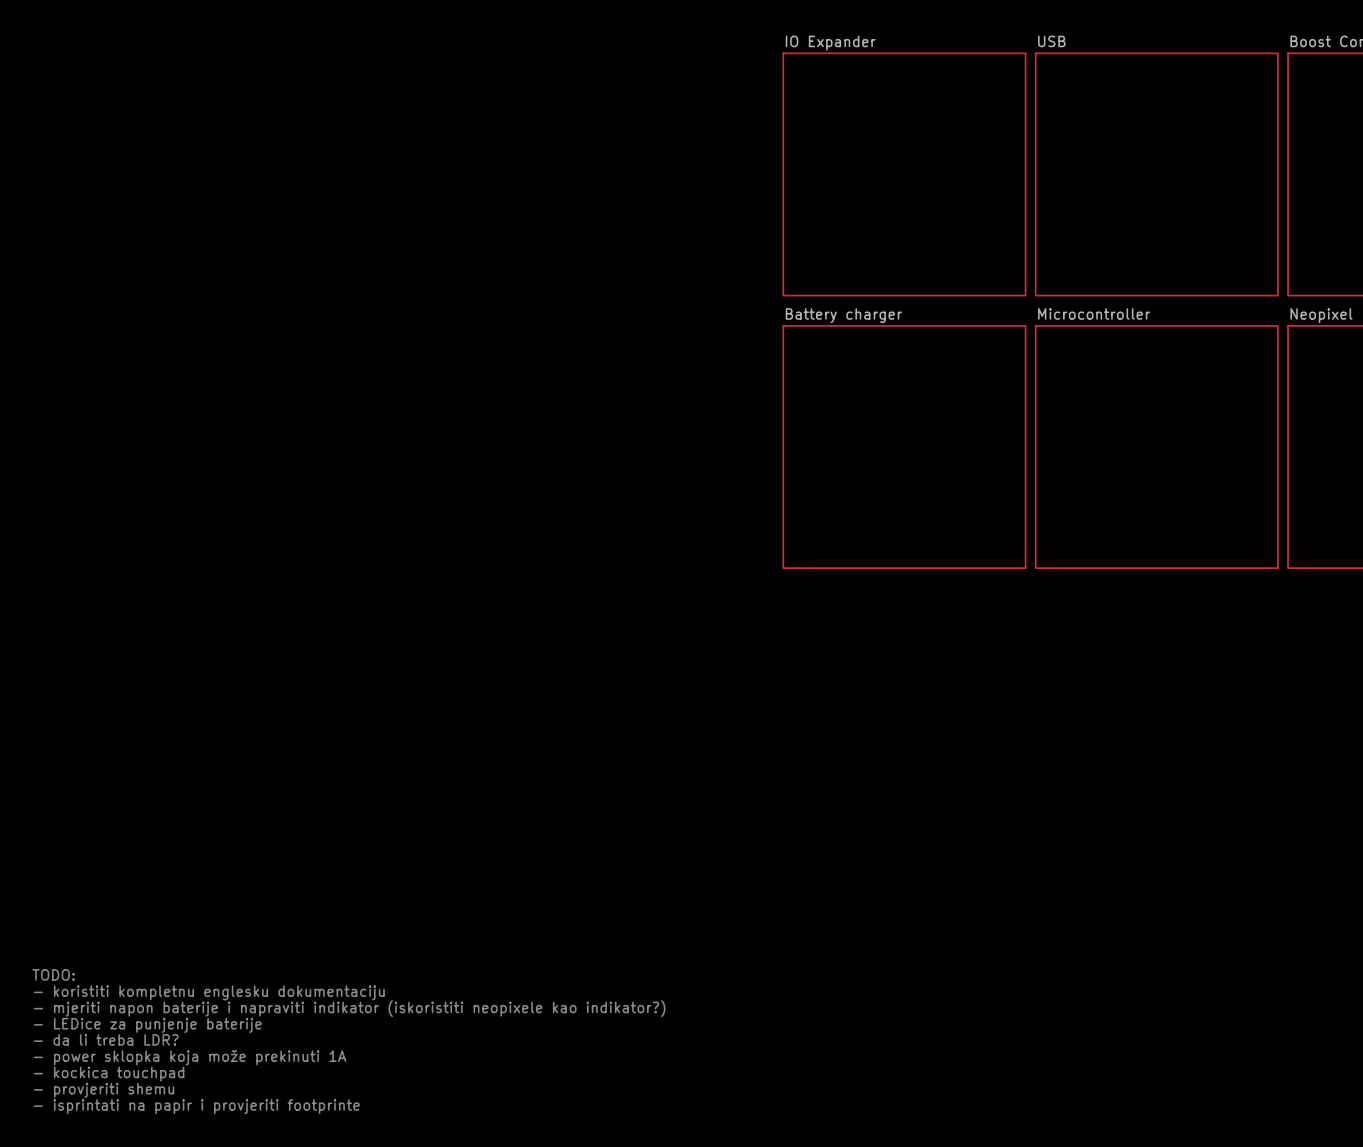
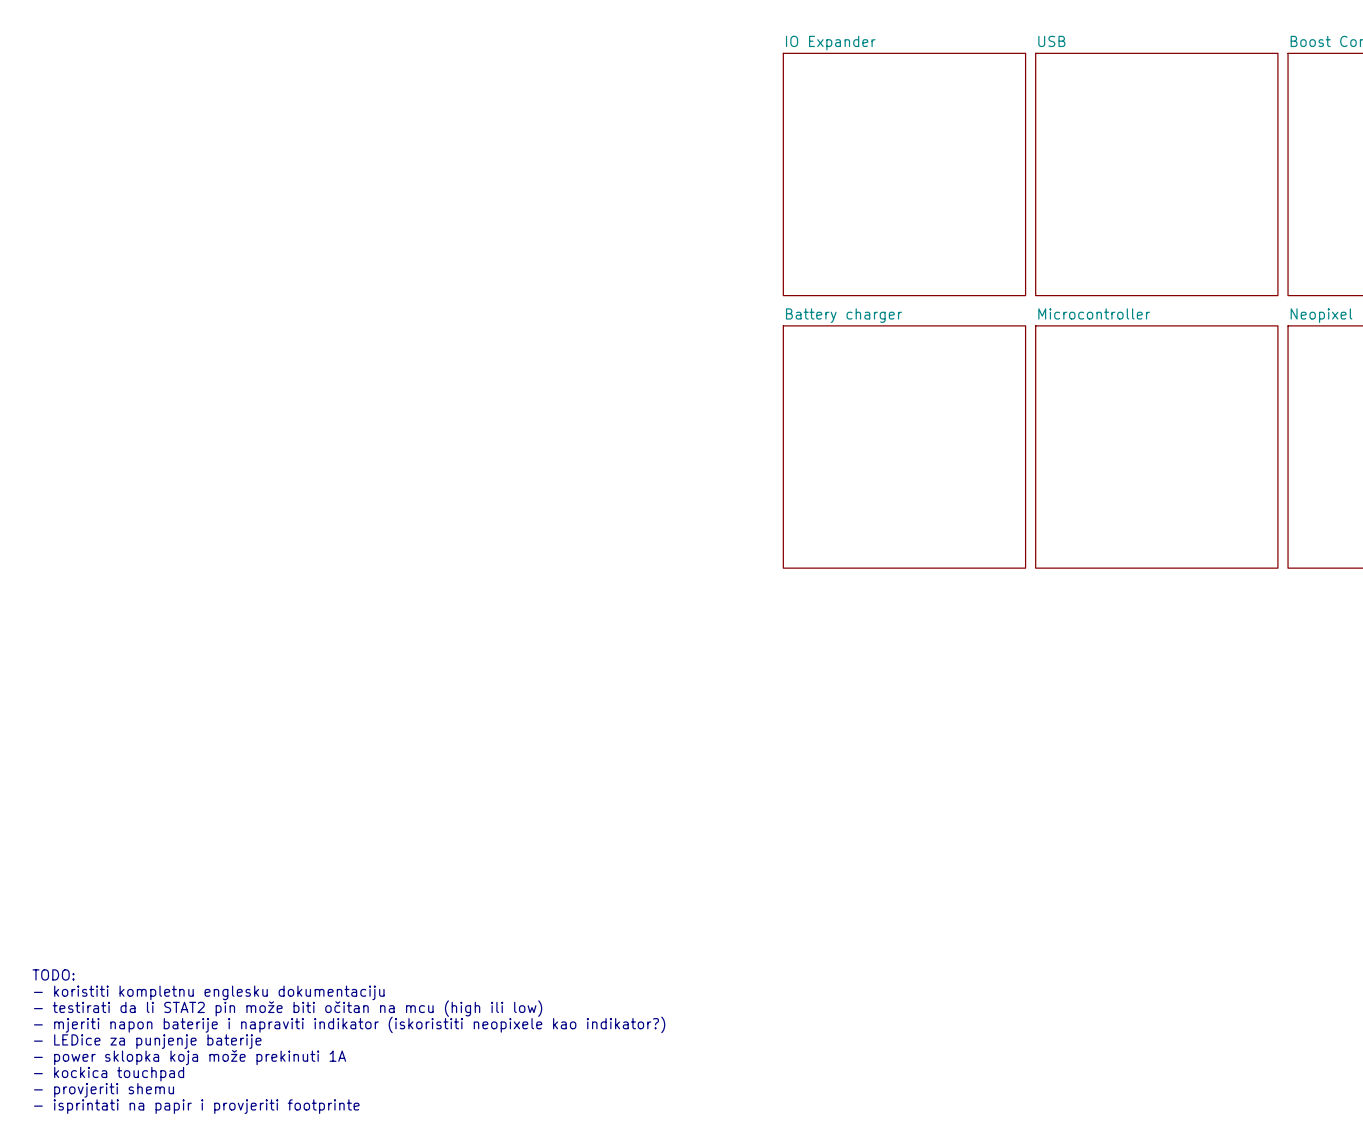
text: - mjeriti napon baterije i napraviti indikator (iskoristiti neopixele kao indikator?) (349, 1008) -> - testirati da li STAT2 pin može biti očitan na mcu (high ili low) (288, 1008)
text: - LEDice za punjenje baterije (147, 1025) -> - mjeriti napon baterije i napraviti indikator (iskoristiti neopixele kao indikator?) (349, 1024)
text: - da li treba LDR? (106, 1039) -> - LEDice za punjenje baterije (147, 1041)

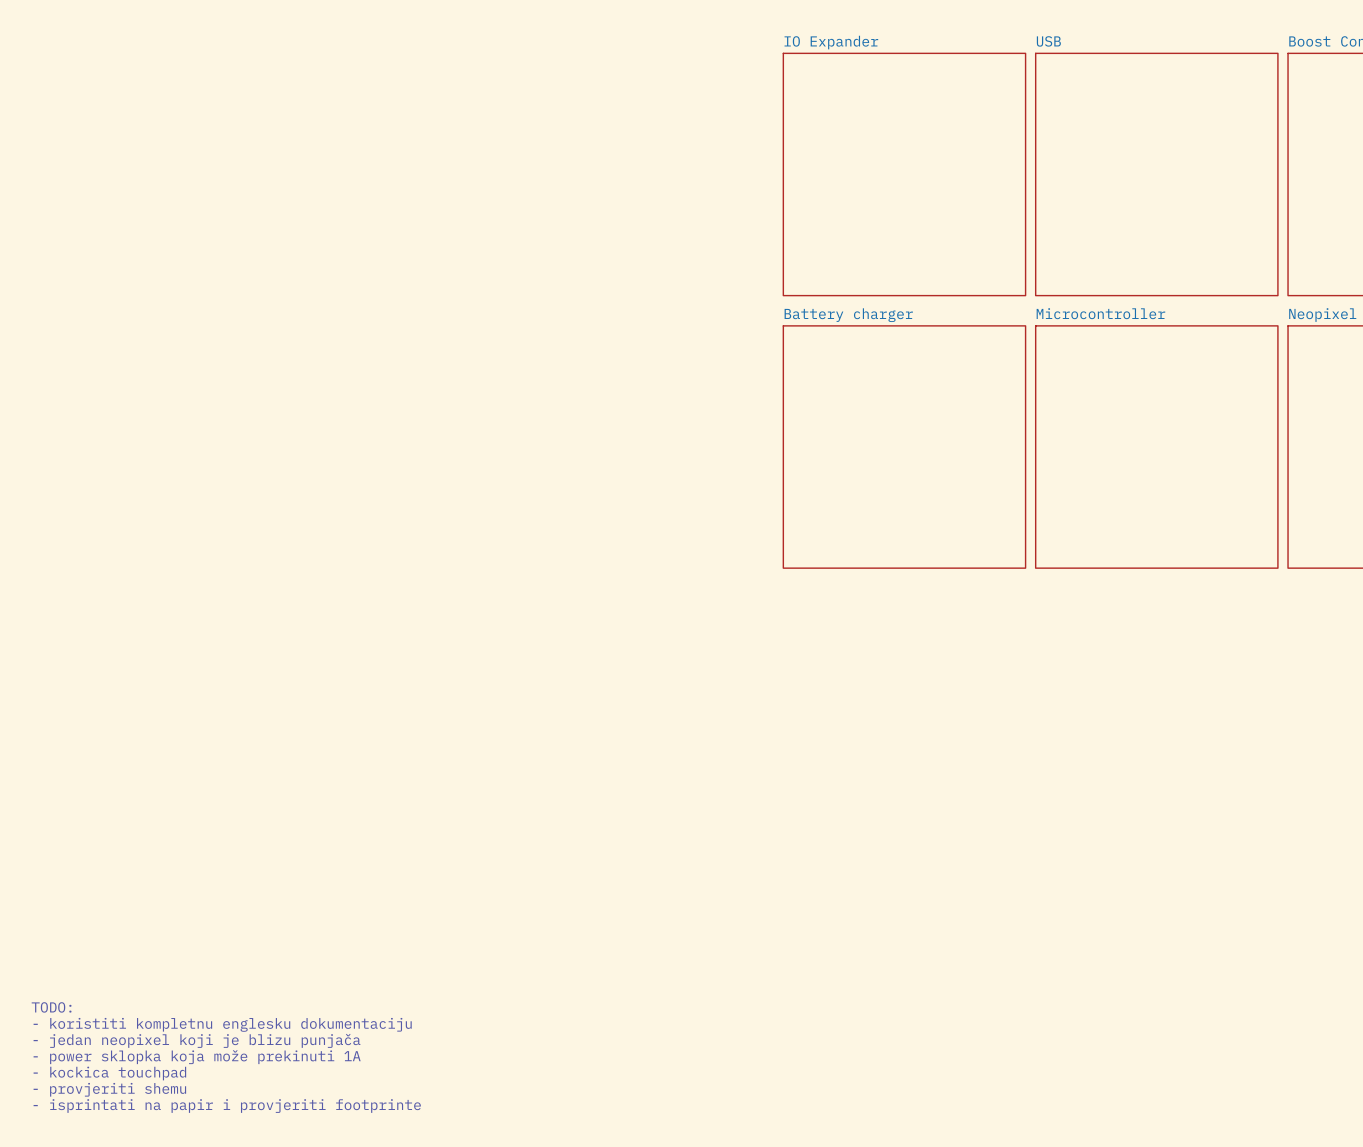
text: TODO: (53, 974) -> none
text: - koristiti kompletnu englesku dokumentaciju (209, 992) -> none
text: - testirati da li STAT2 pin može biti očitan na mcu (high ili low) (288, 1008) -> TODO: (51, 1007)
text: - mjeriti napon baterije i napraviti indikator (iskoristiti neopixele kao indikator?) (349, 1024) -> - koristiti kompletnu englesku dokumentaciju (222, 1024)
text: - LEDice za punjenje baterije (147, 1041) -> - jedan neopixel koji je blizu punjača (196, 1040)

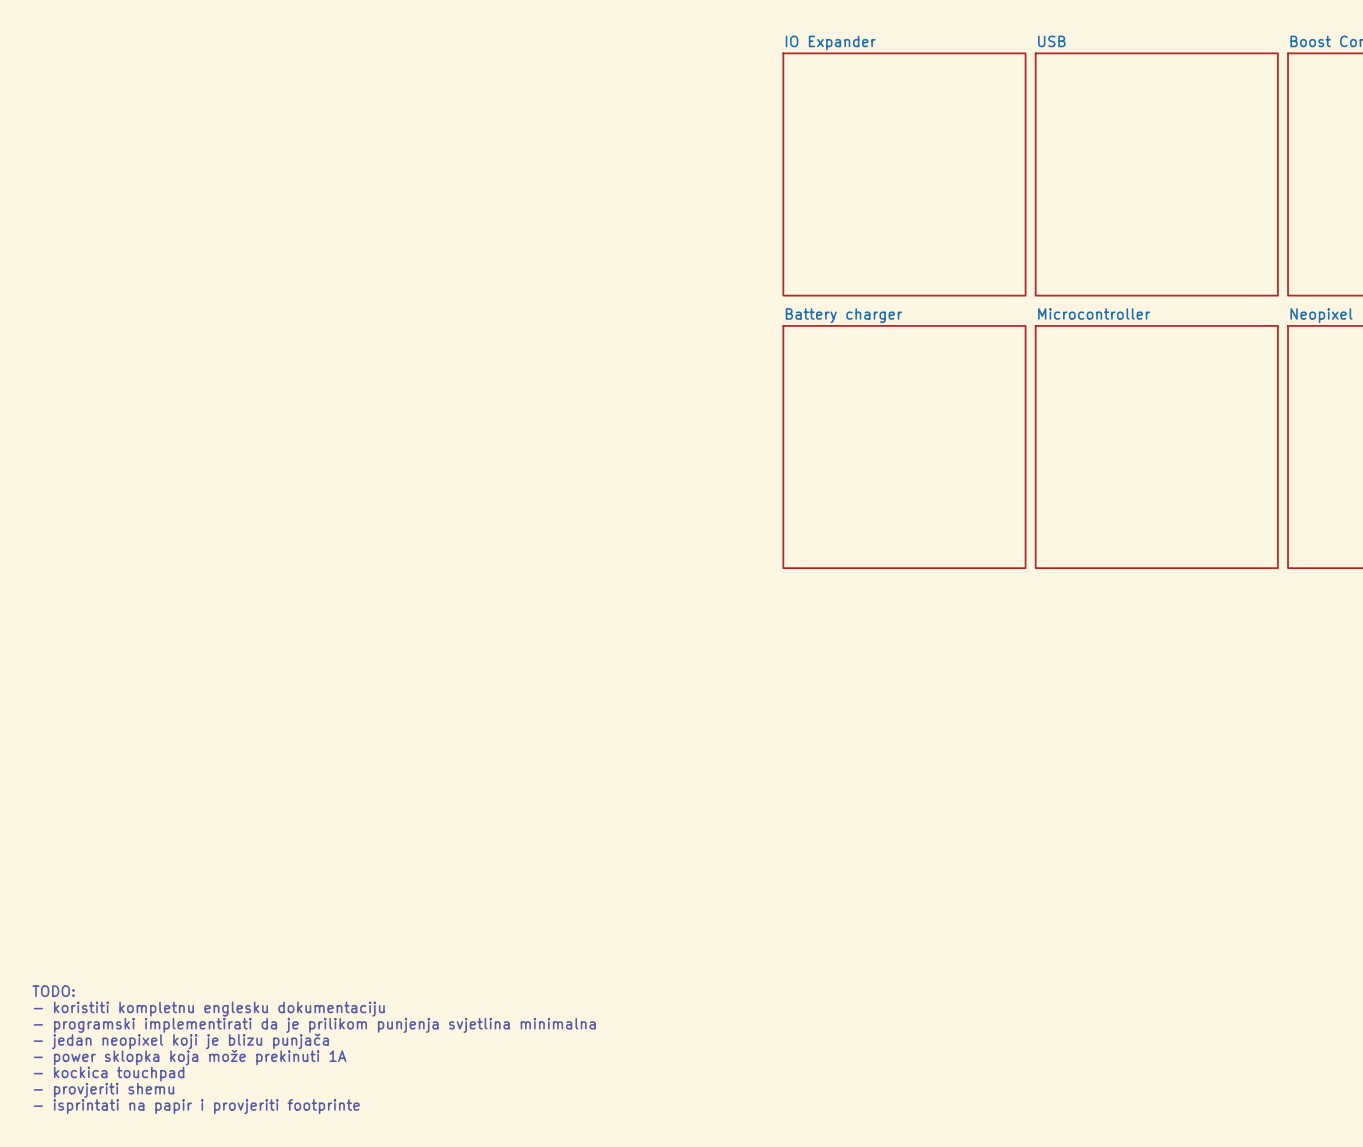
text: none -> TODO: (53, 991)
text: TODO: (51, 1007) -> - koristiti kompletnu englesku dokumentaciju (209, 1009)
text: - koristiti kompletnu englesku dokumentaciju (222, 1024) -> - programski implementirati da je prilikom punjenja svjetlina minimalna (314, 1025)

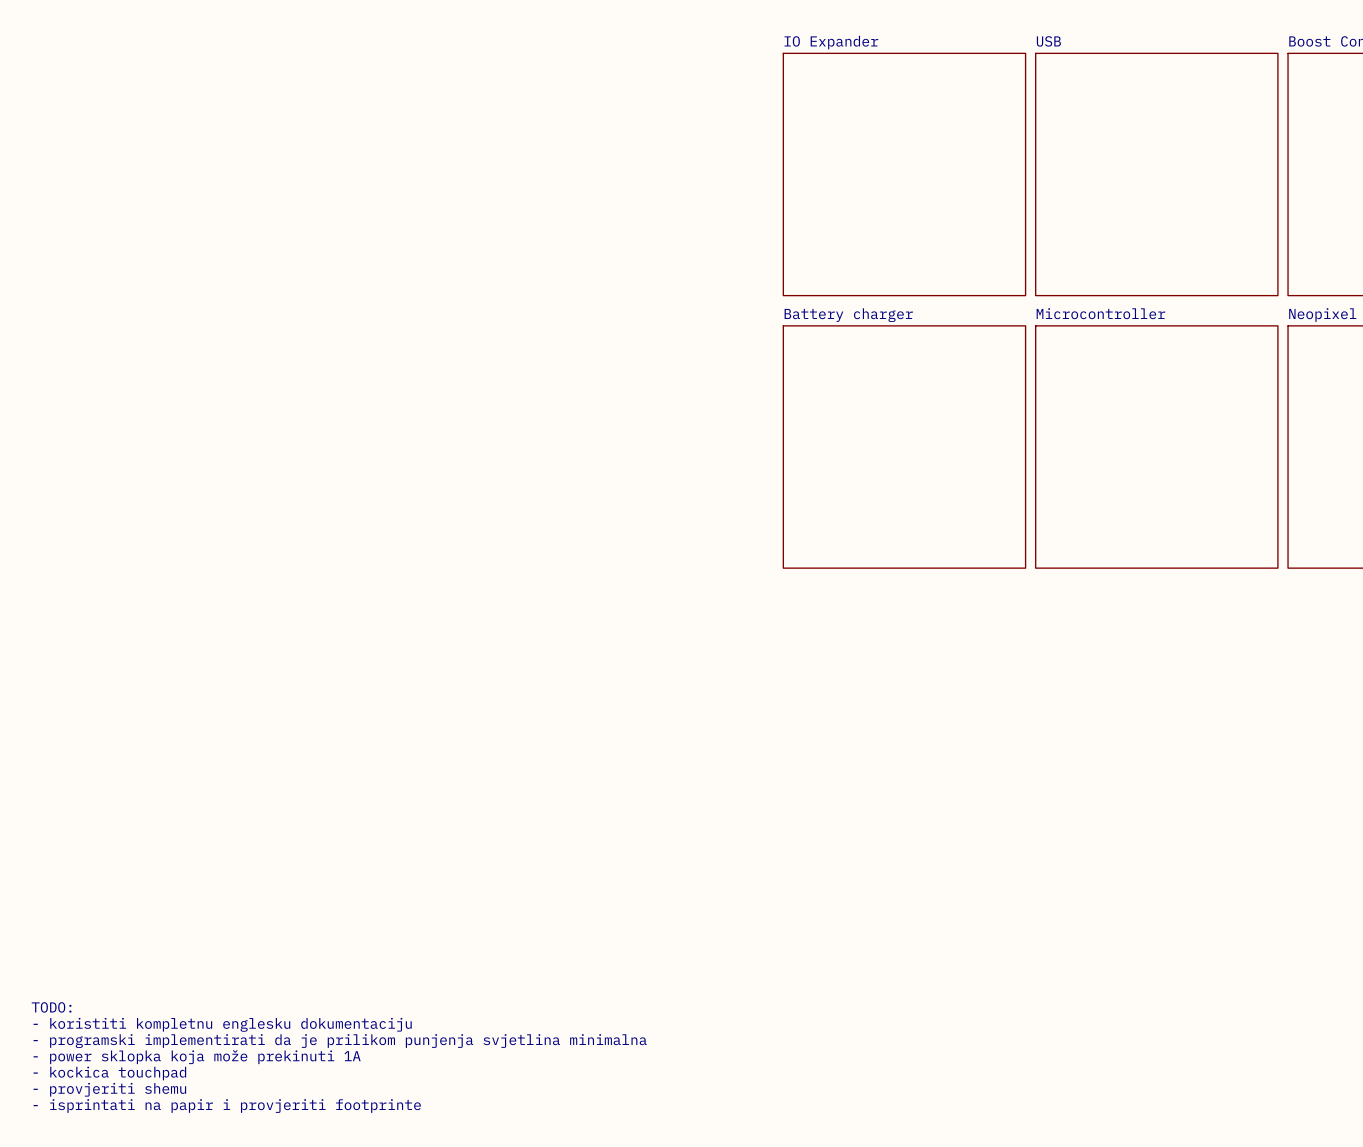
text: TODO: (53, 991) -> none
text: - koristiti kompletnu englesku dokumentaciju (209, 1009) -> TODO: (51, 1007)
text: - programski implementirati da je prilikom punjenja svjetlina minimalna (314, 1025) -> - koristiti kompletnu englesku dokumentaciju (222, 1024)
text: - jedan neopixel koji je blizu punjača (181, 1041) -> - programski implementirati da je prilikom punjenja svjetlina minimalna (340, 1041)

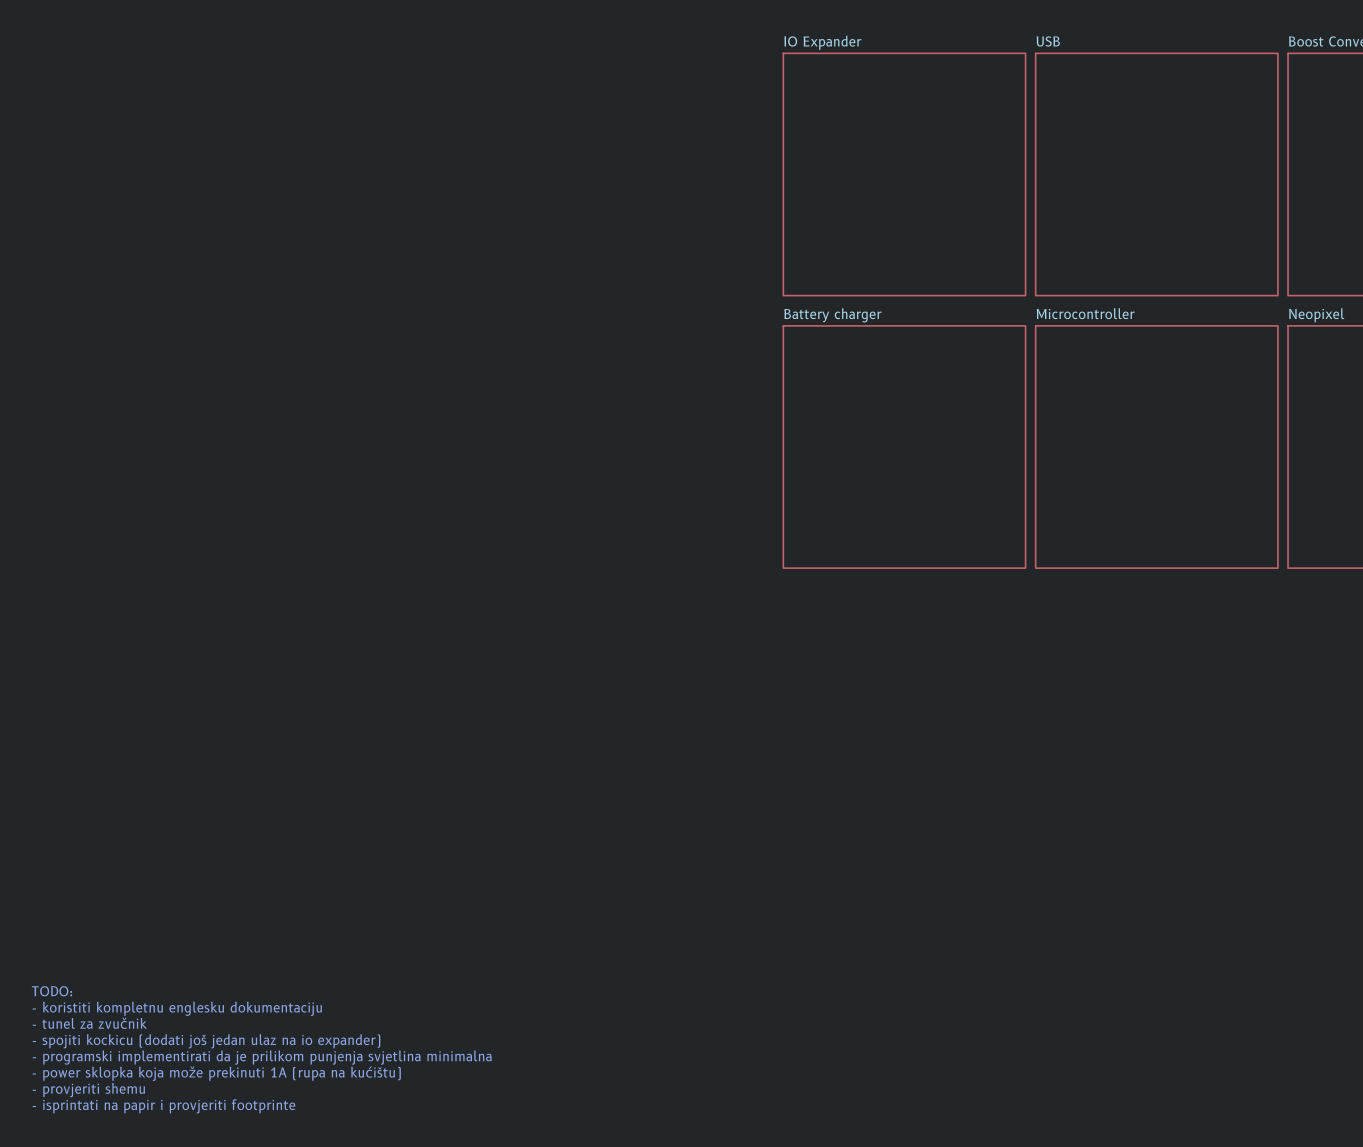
text: none -> TODO: (52, 991)
text: TODO: (51, 1007) -> - koristiti kompletnu englesku dokumentaciju (177, 1008)
text: - koristiti kompletnu englesku dokumentaciju (222, 1024) -> - tunel za zvučnik (89, 1023)
text: - programski implementirati da je prilikom punjenja svjetlina minimalna (340, 1041) -> - spojiti kockicu (dodati još jedan ulaz na io expander) (206, 1041)
text: - power sklopka koja može prekinuti 1A (197, 1057) -> - programski implementirati da je prilikom punjenja svjetlina minimalna (262, 1057)
text: - kockica touchpad (109, 1073) -> - power sklopka koja može prekinuti 1A (rupa na kućištu) (216, 1073)

